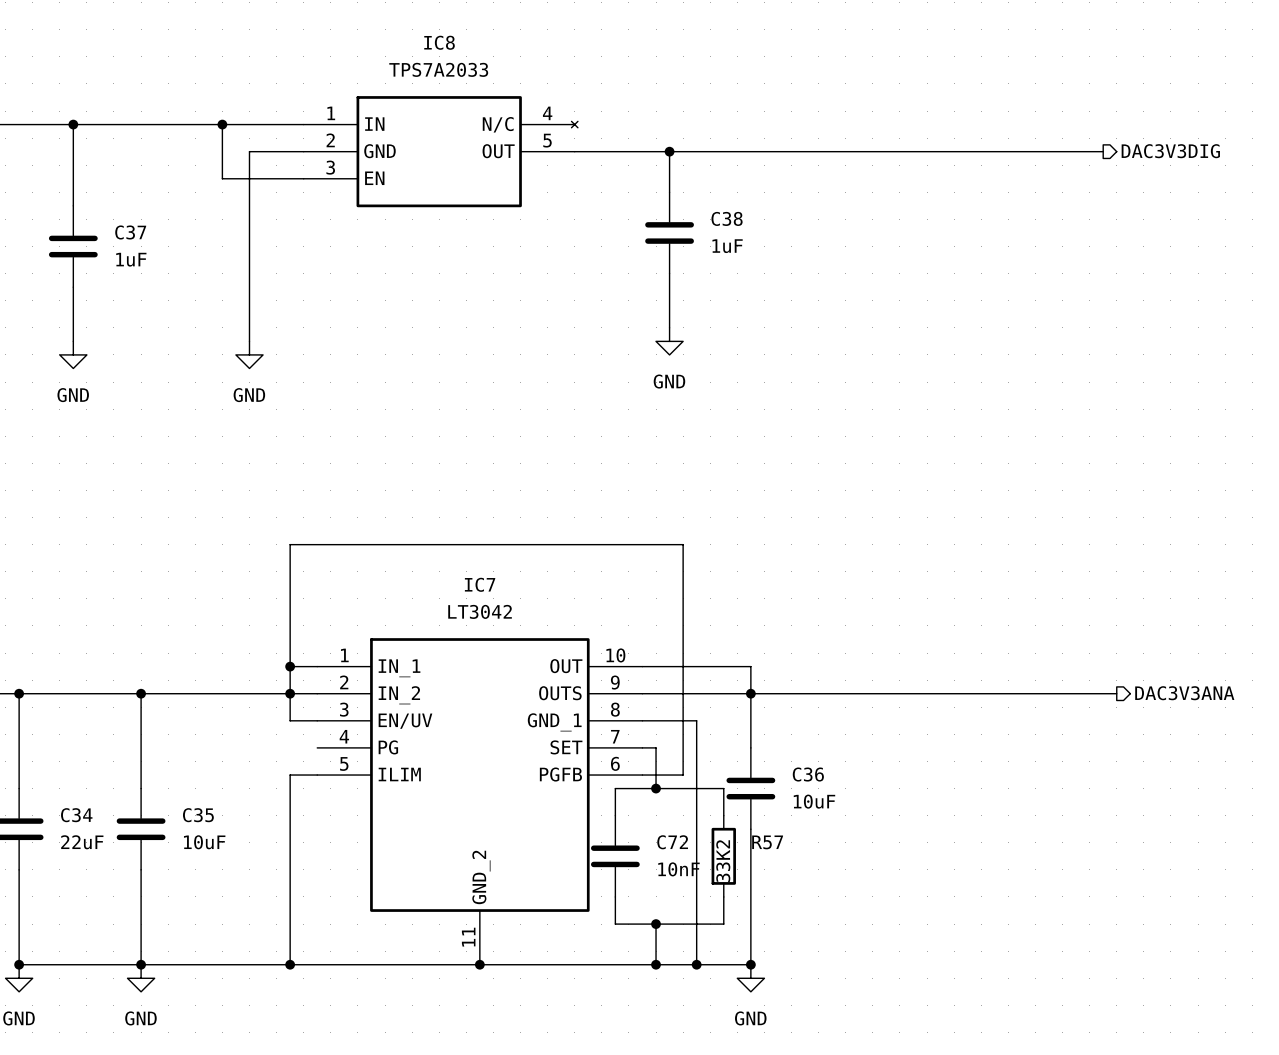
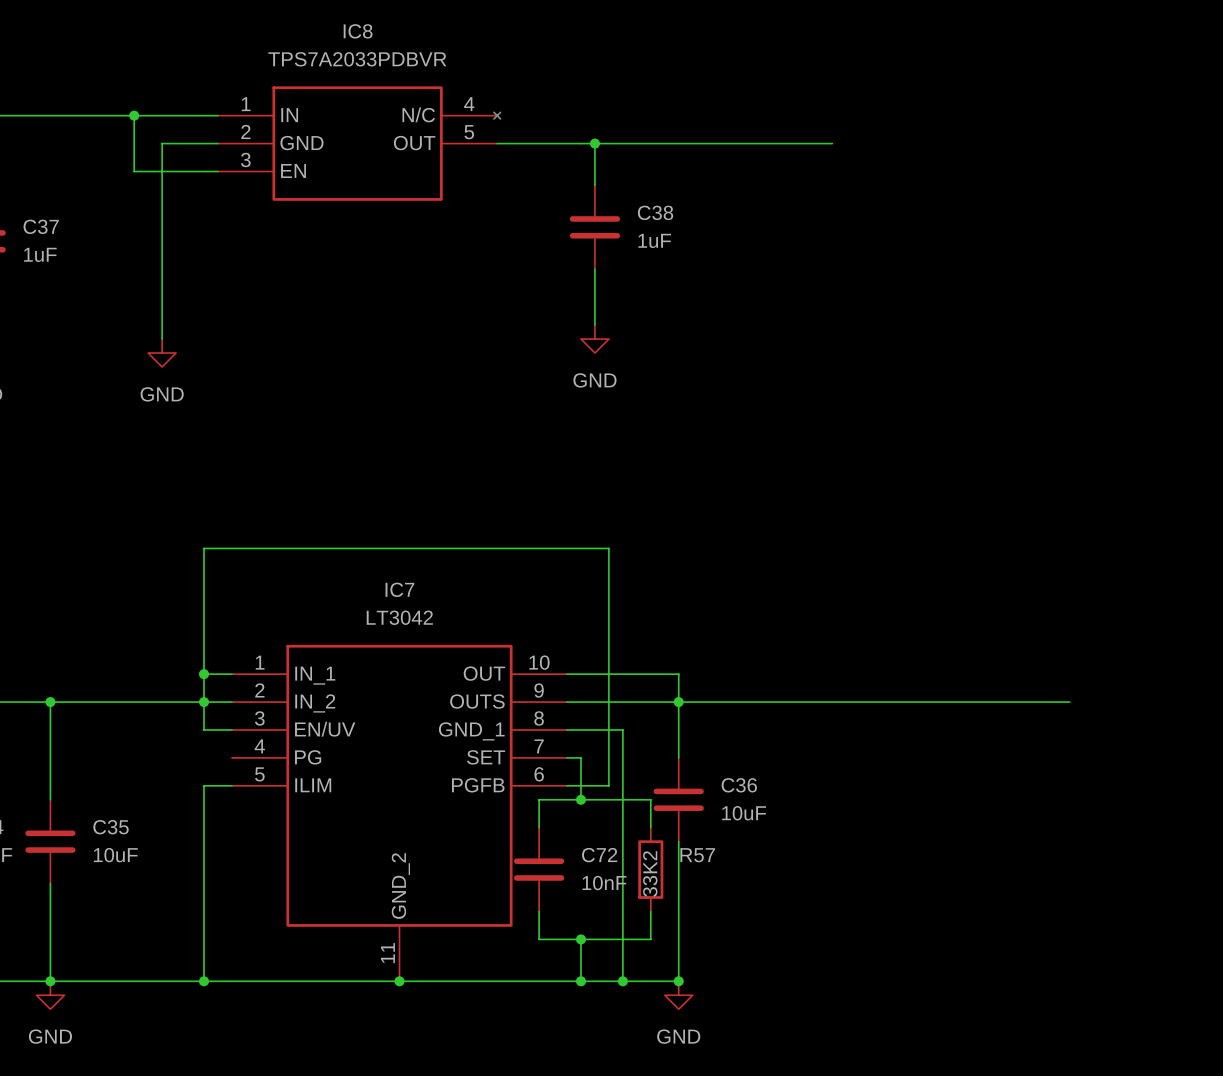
IC8 value: TPS7A2033 (438, 69) -> TPS7A2033PDBVR (357, 59)
wire: (899, 151) (1103, 151) -> none
hierarchical label: DAC3V3DIG (1170, 151) -> none
wire: none -> (1055, 702) (1069, 702)
hierarchical label: DAC3V3ANA (1184, 693) -> none

